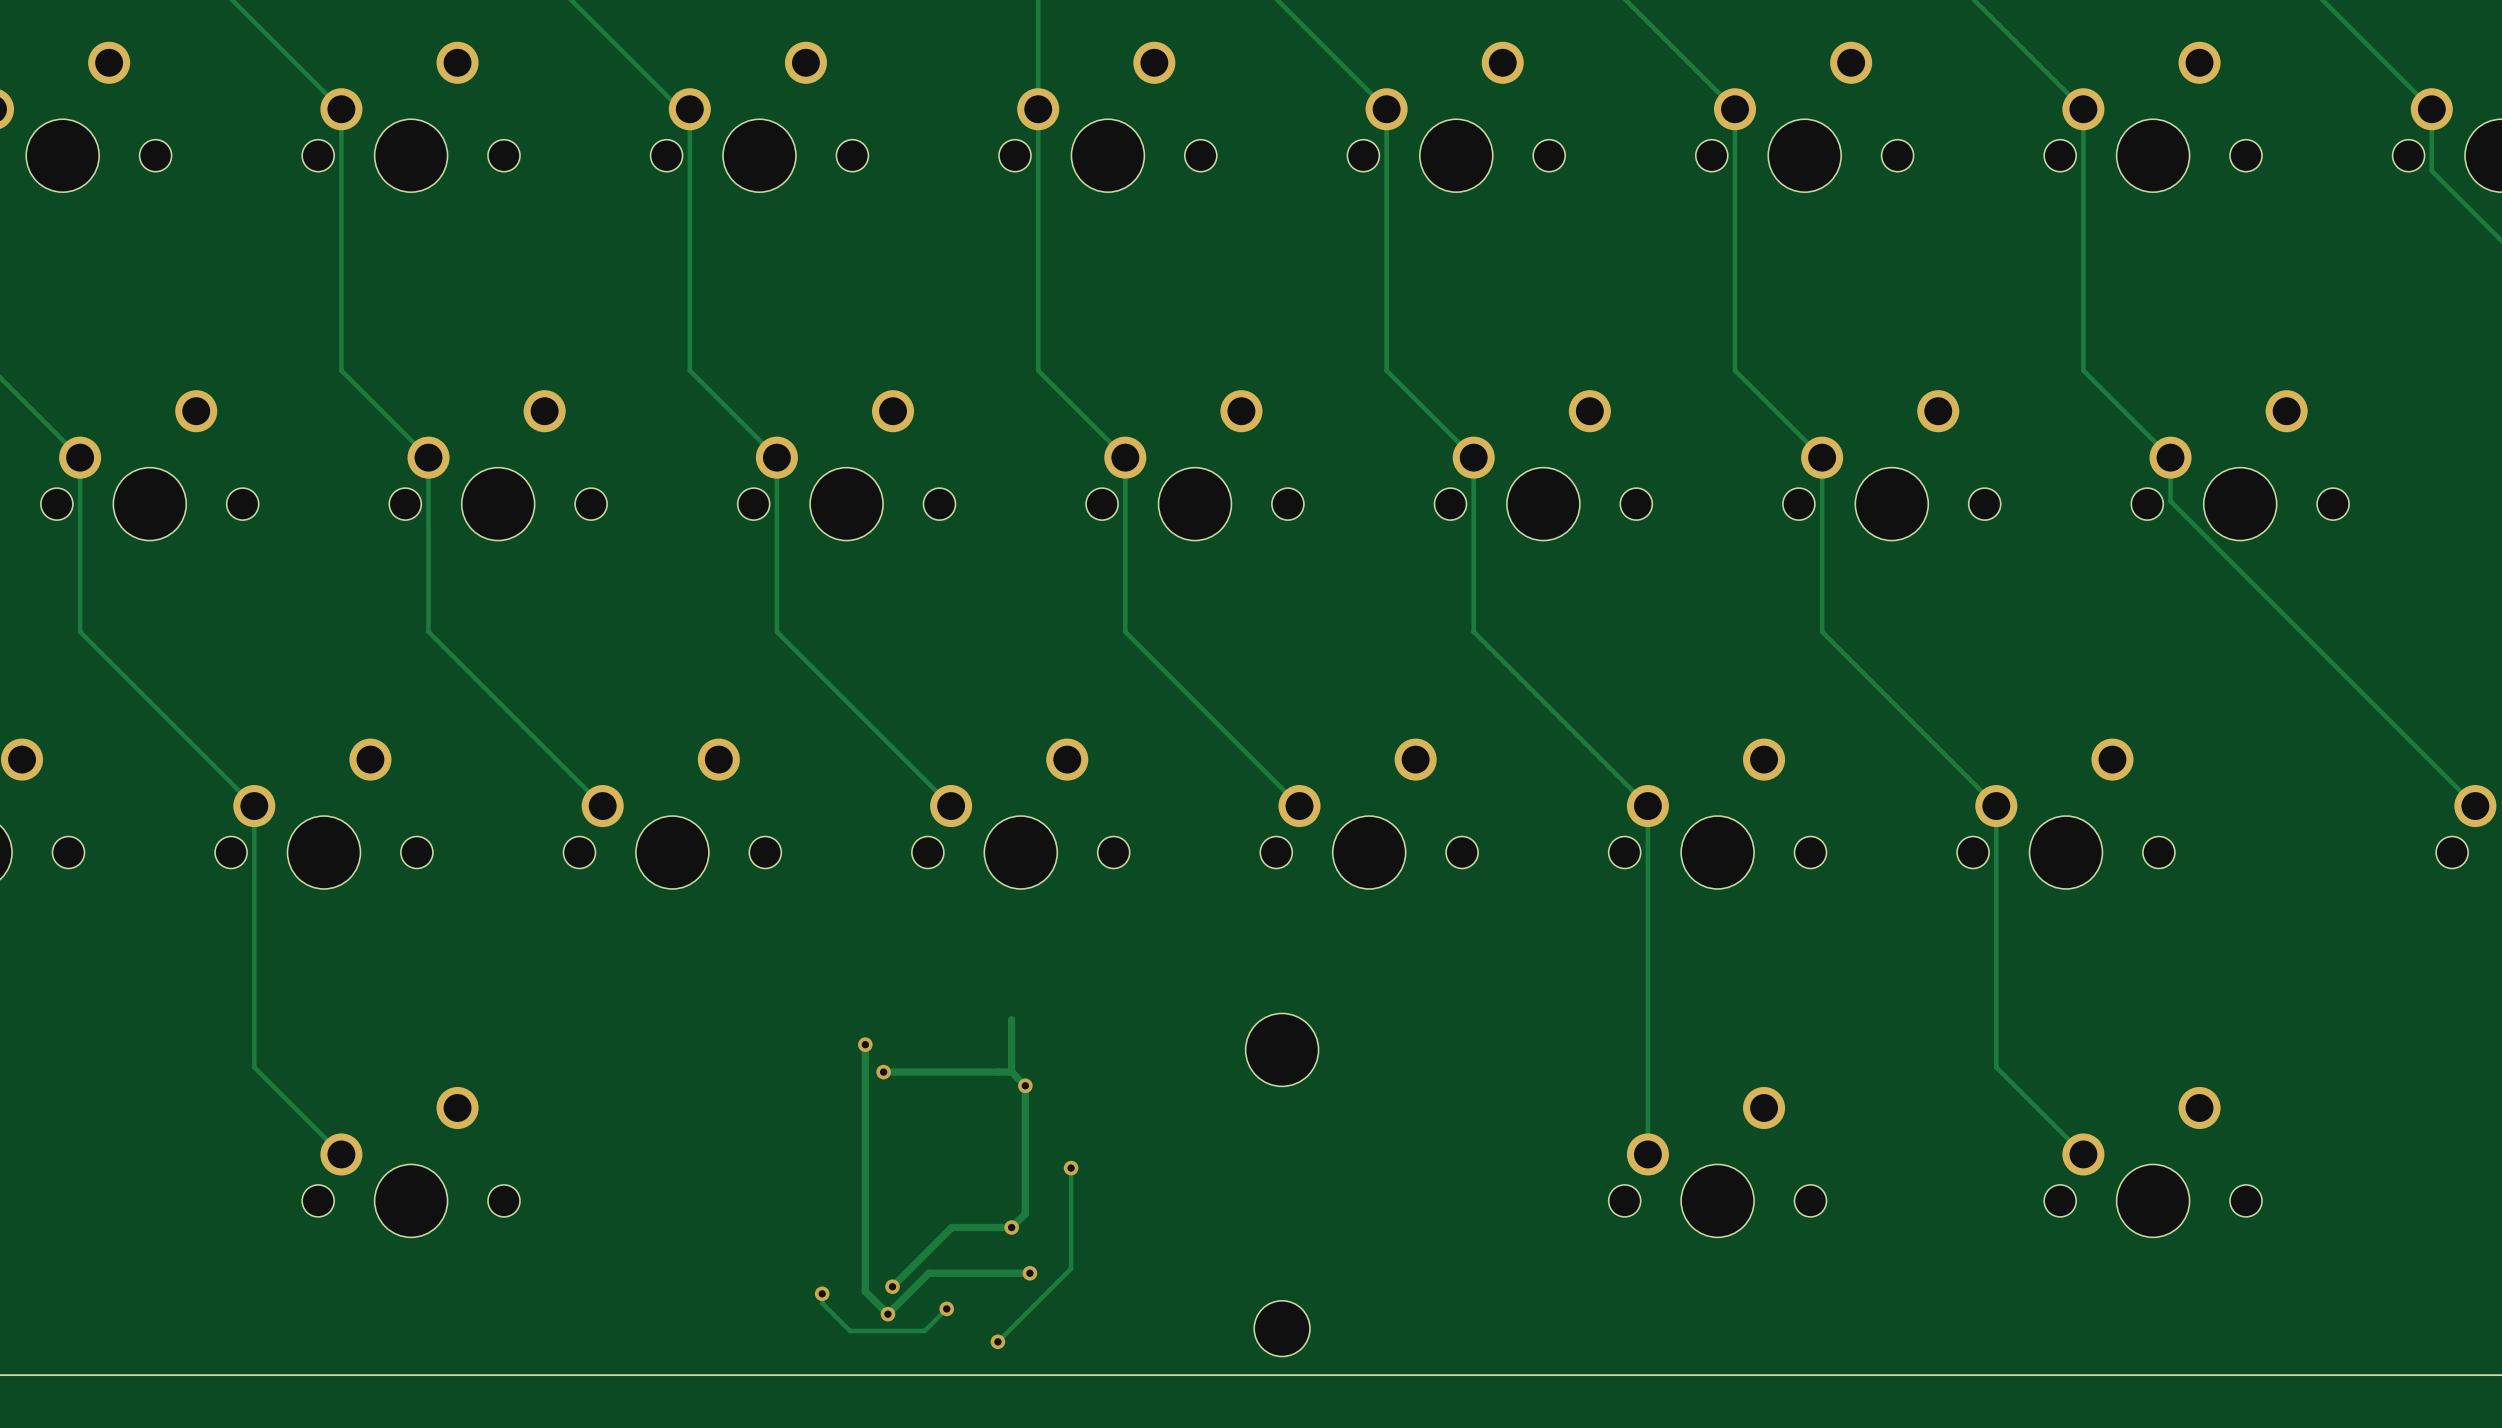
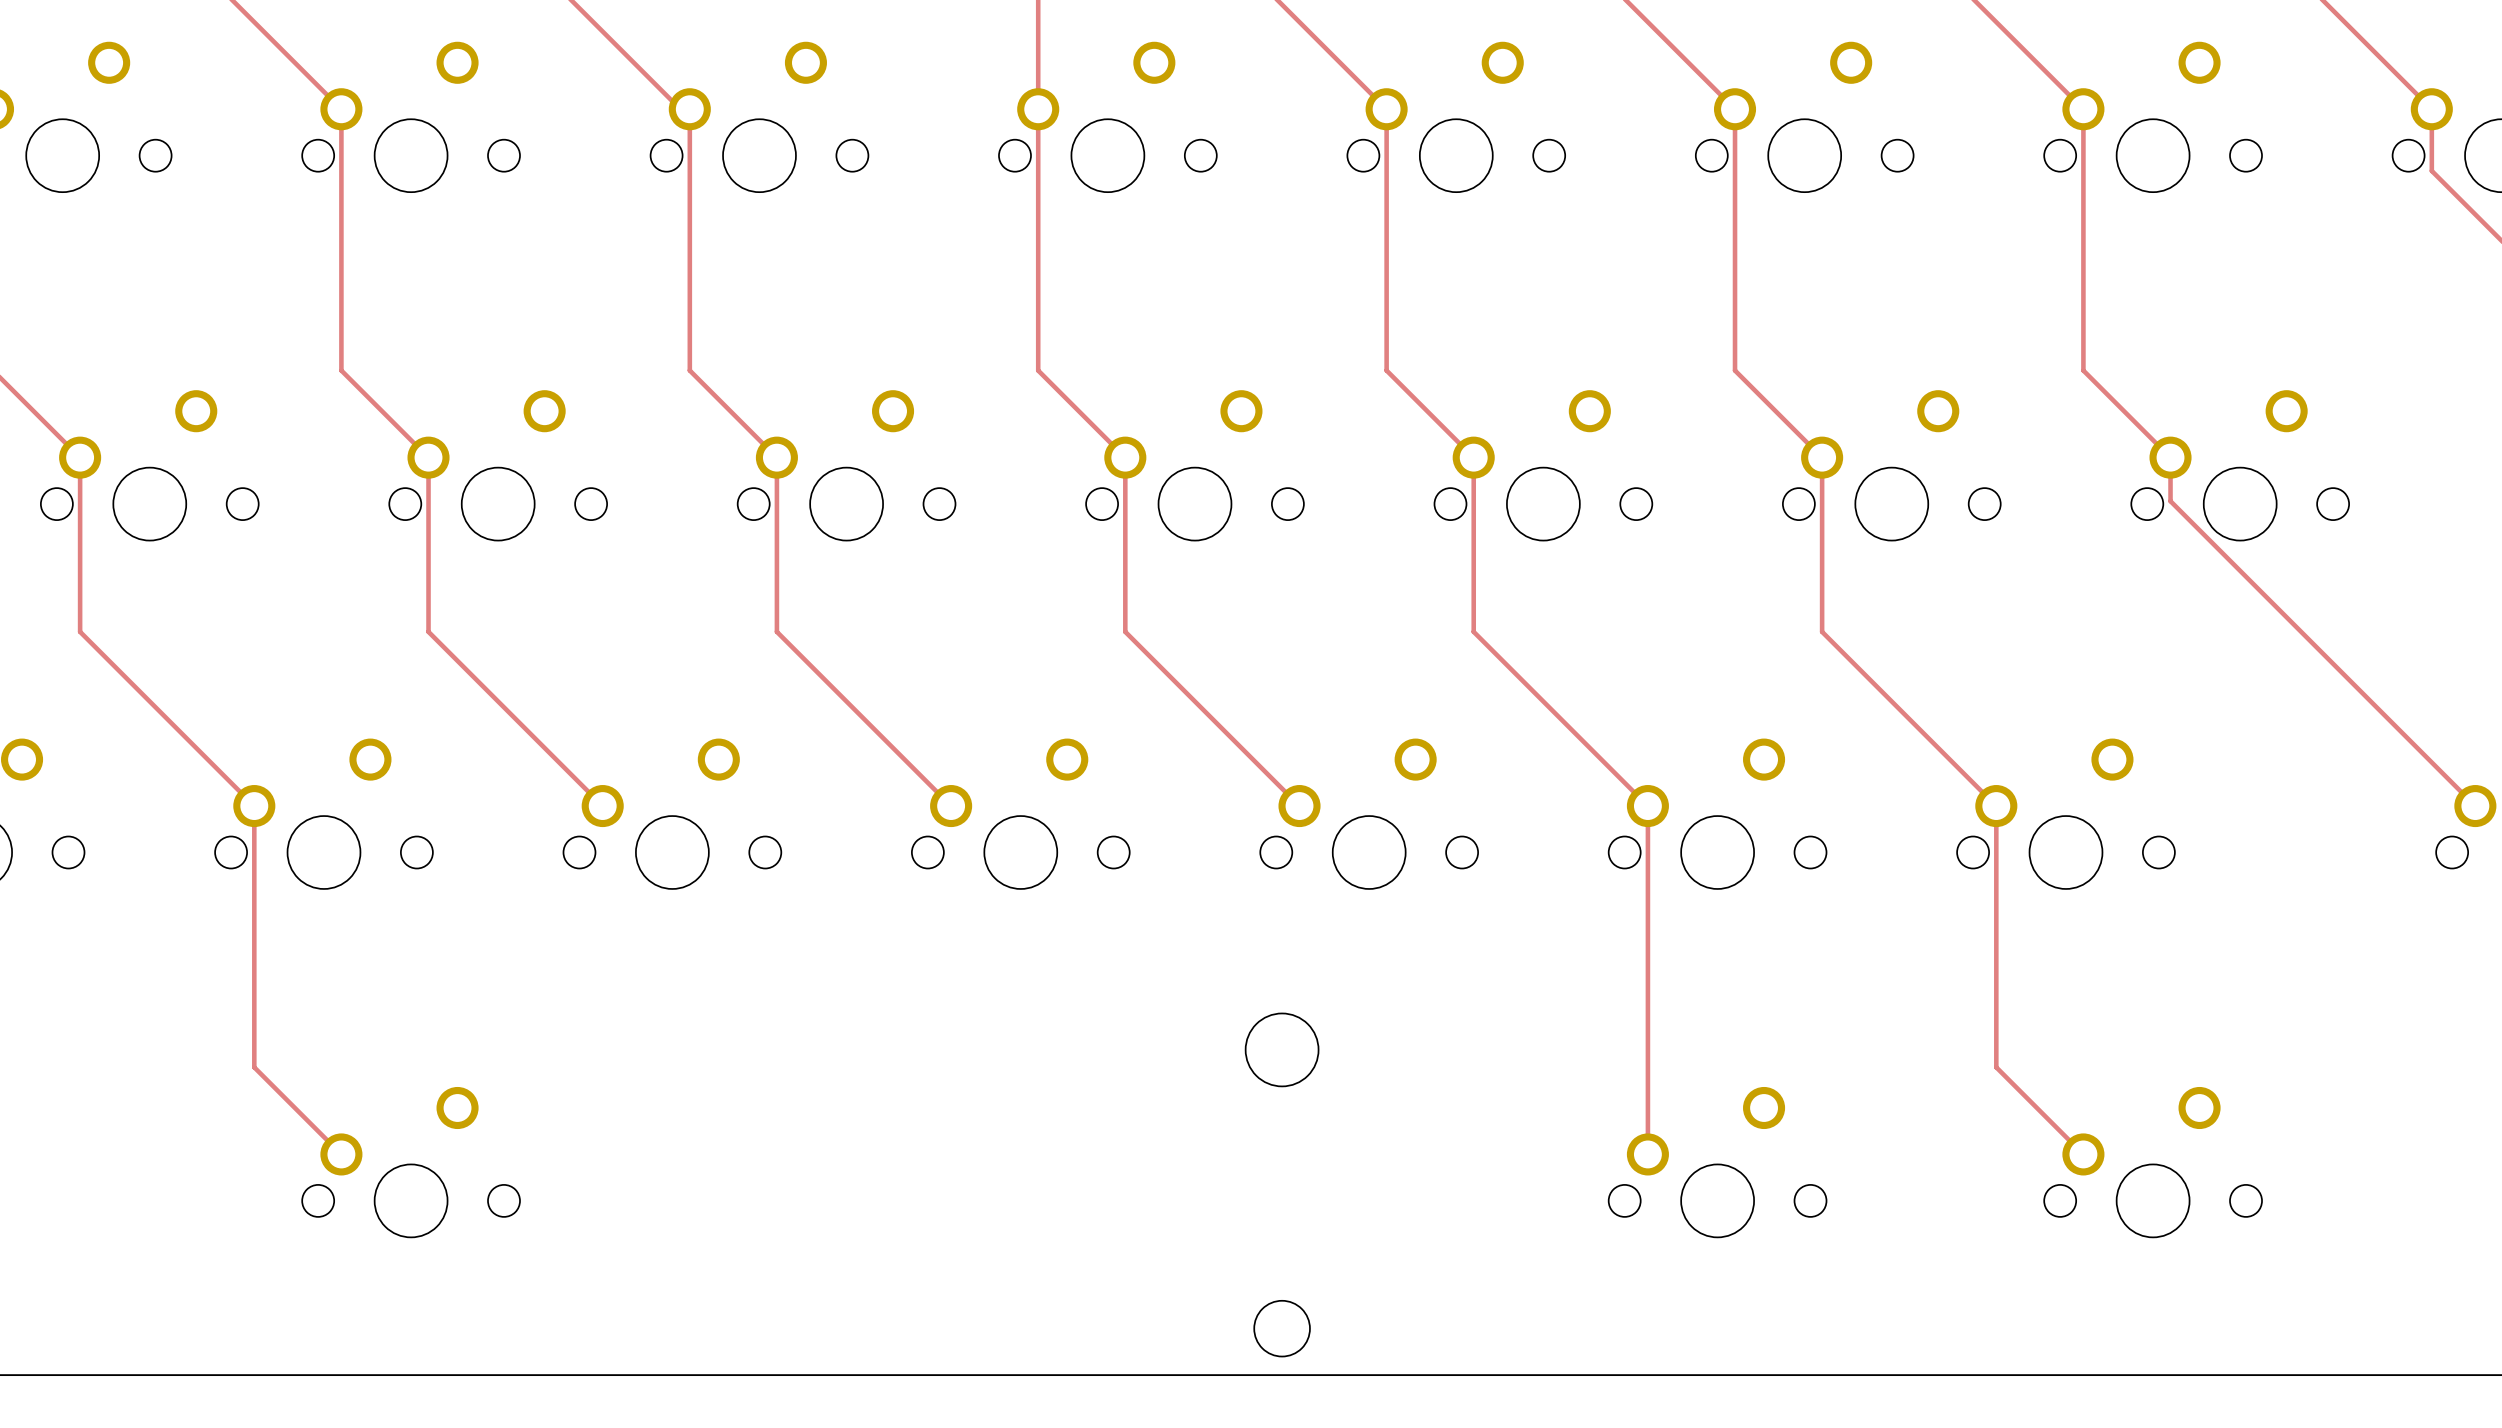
track: (1011, 1019) (1011, 1072) -> none
track: (865, 1044) (865, 1291) (887, 1314) (928, 1273) (1029, 1273) -> none
via: (865, 1044) -> none
track: (883, 1072) (1011, 1072) -> none
via: (883, 1072) -> none
track: (1011, 1072) (1025, 1085) (1025, 1213) (1011, 1227) (951, 1227) (892, 1286) -> none
via: (1025, 1085) -> none
track: (1071, 1168) (1071, 1268) (997, 1341) -> none
via: (1071, 1168) -> none
via: (1011, 1227) -> none
via: (1029, 1273) -> none
via: (892, 1286) -> none
track: (822, 1293) (822, 1303) (850, 1330) (924, 1330) (946, 1308) -> none
via: (822, 1293) -> none
via: (946, 1308) -> none
via: (887, 1314) -> none
via: (997, 1341) -> none

